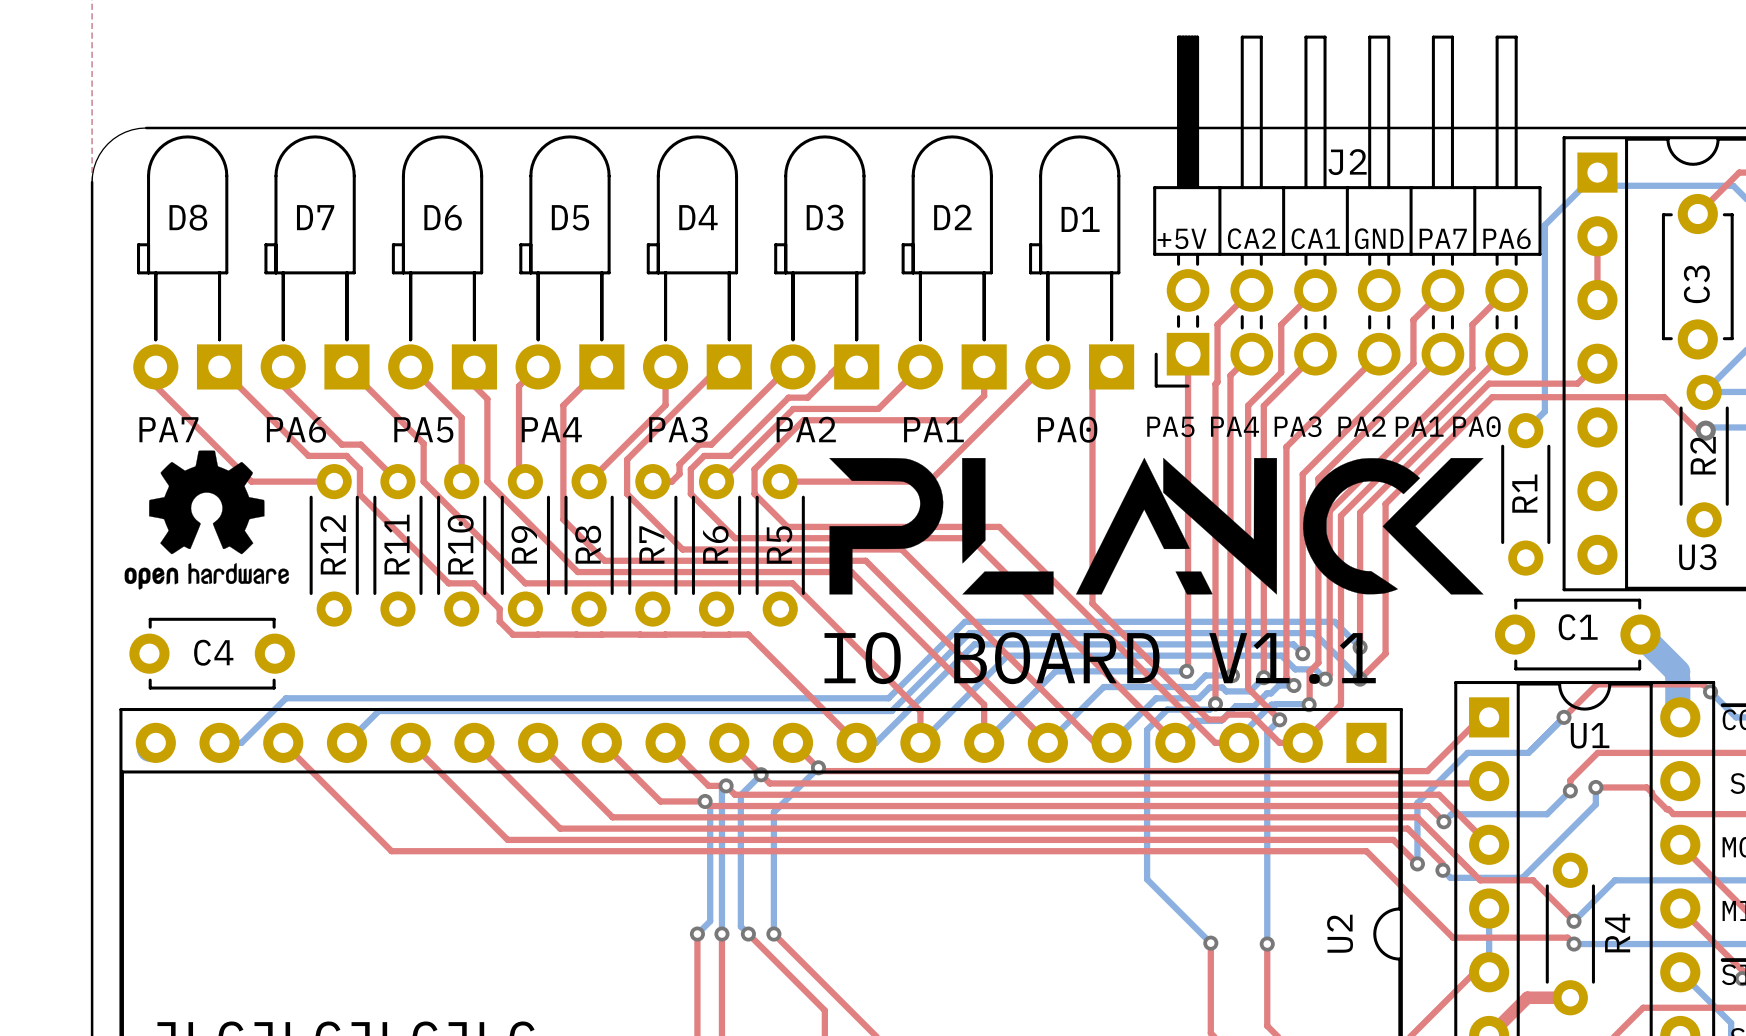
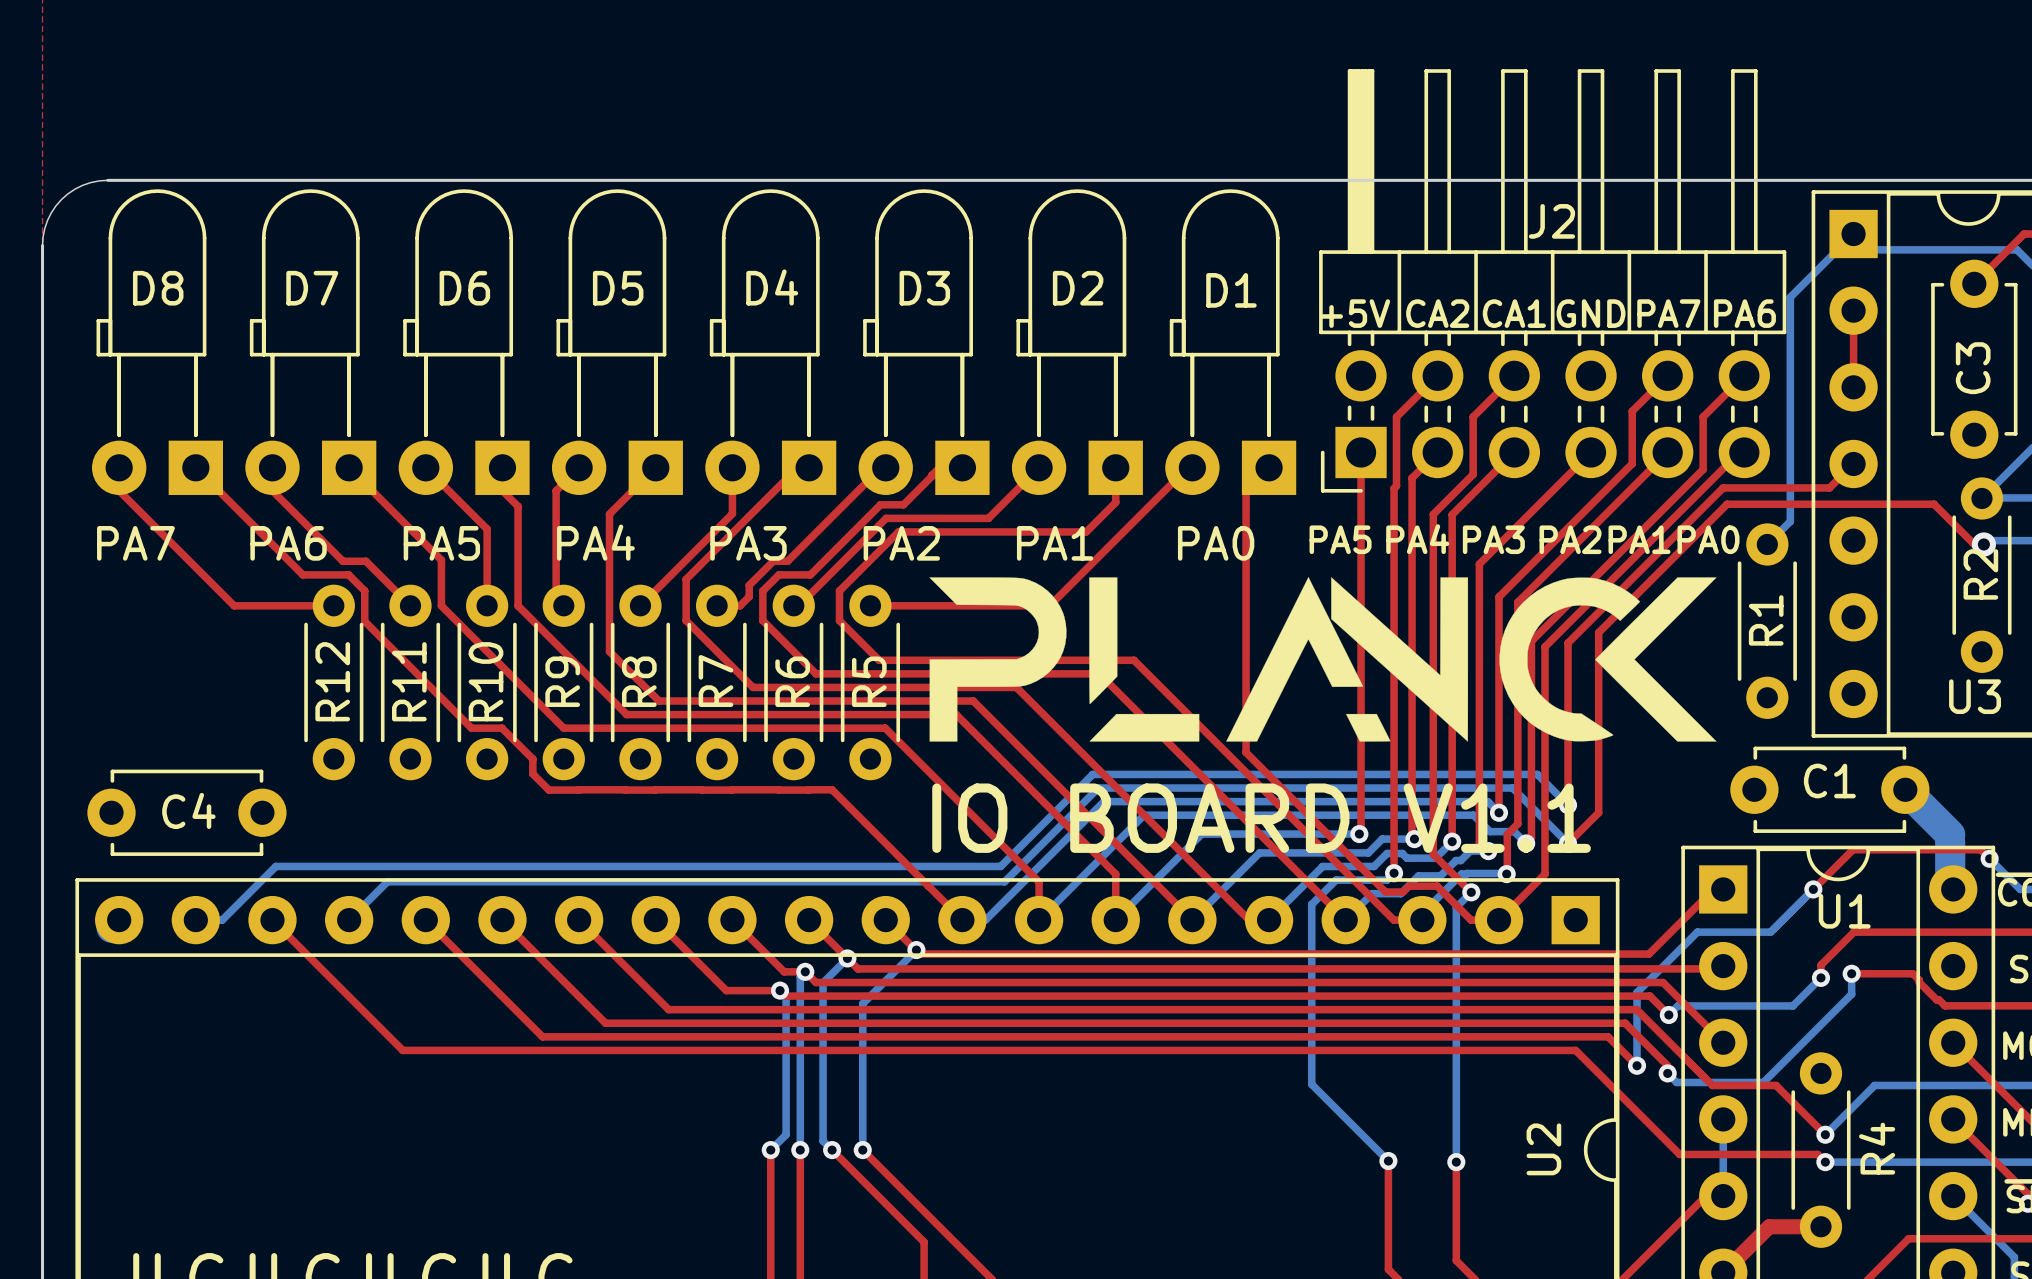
drawing: [124, 450, 289, 590] -> none

